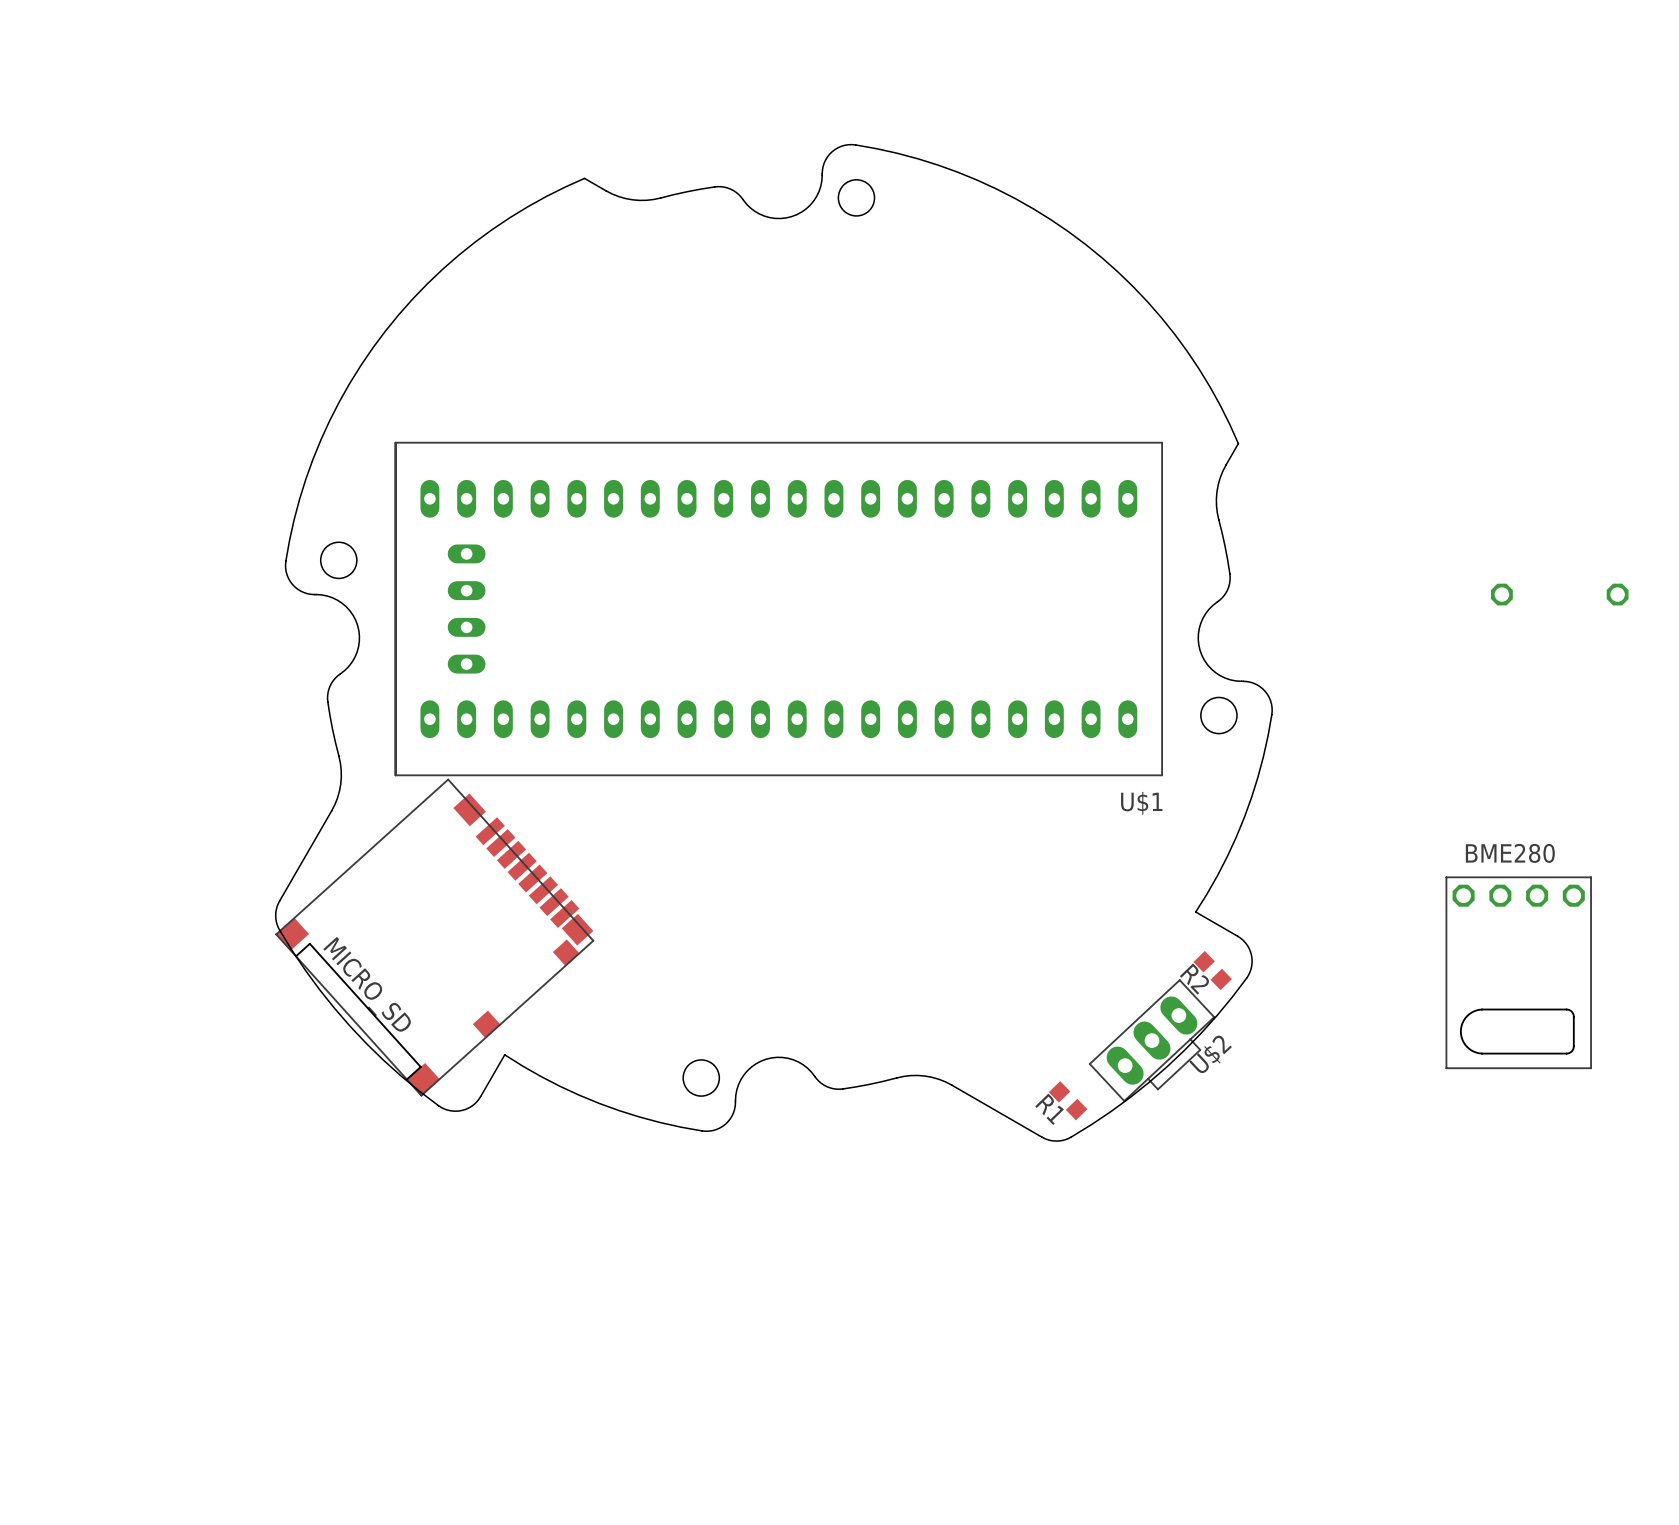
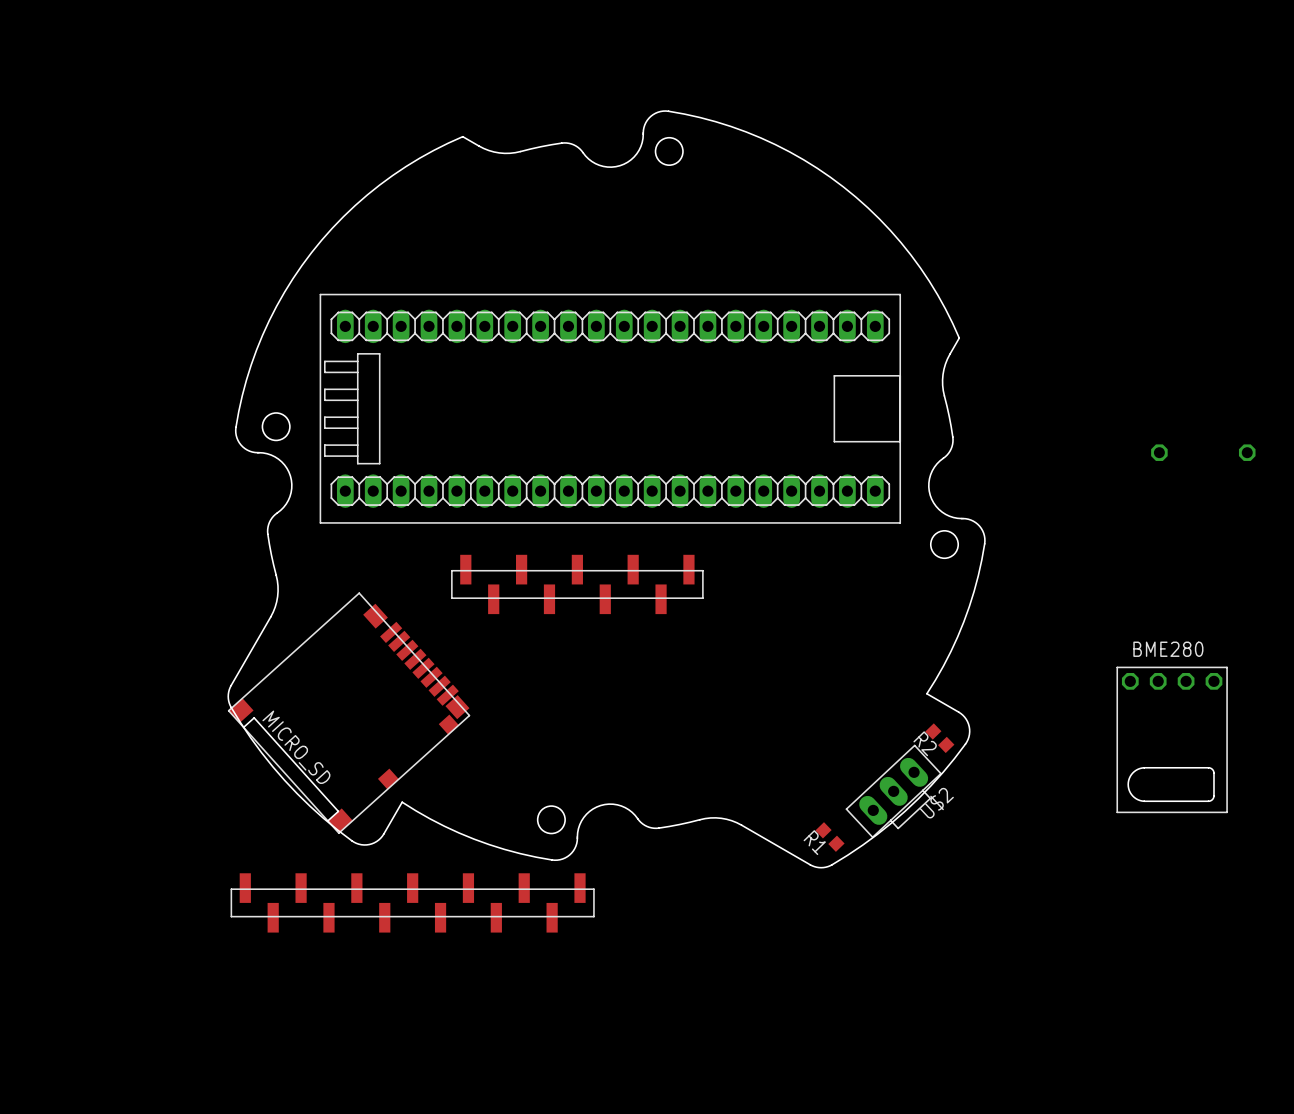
part: none -> (610, 408)
U$1: (778, 609) -> none
part: none -> (577, 584)
part: none -> (412, 902)

